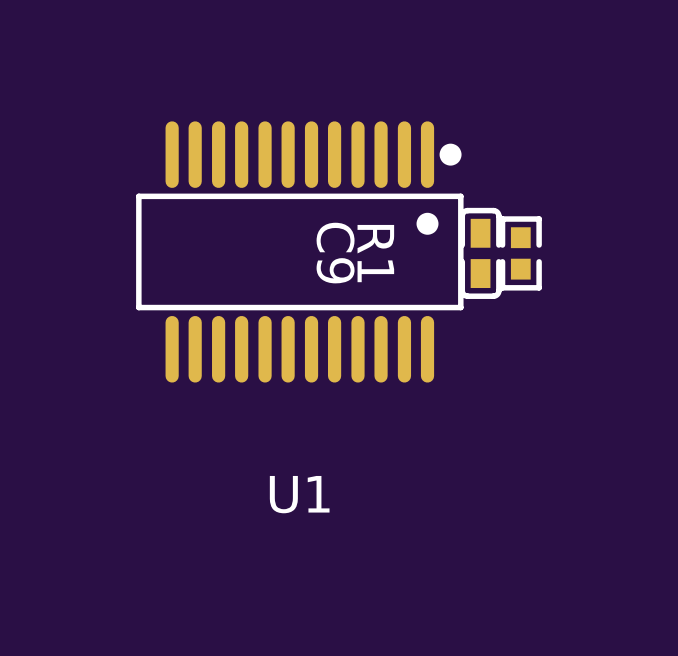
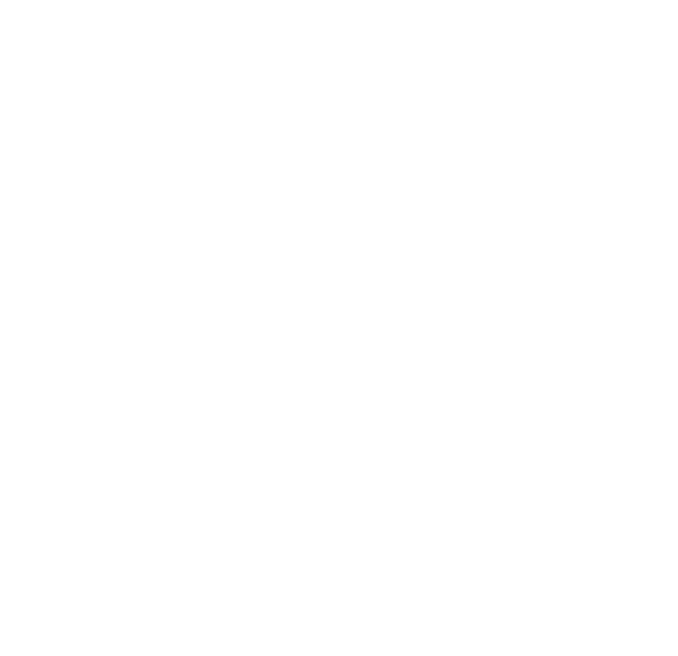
U1: (299, 251) -> none
C9: (480, 253) -> none
R1: (520, 253) -> none

